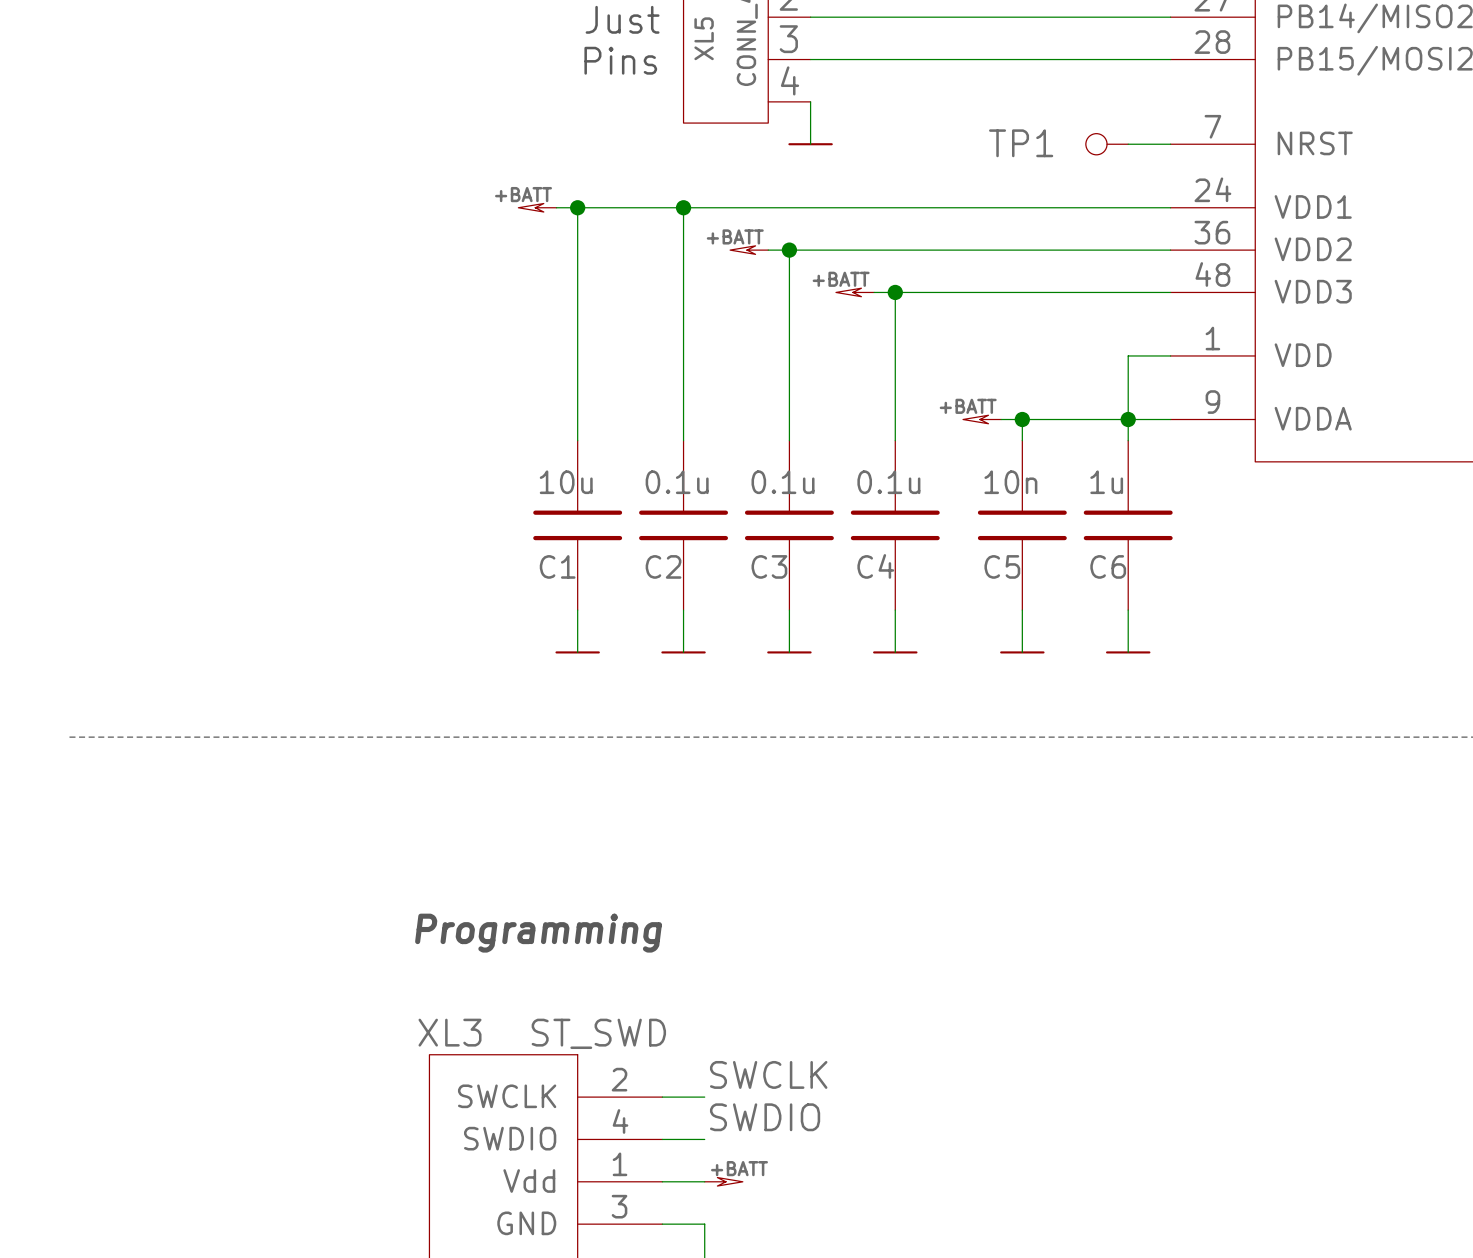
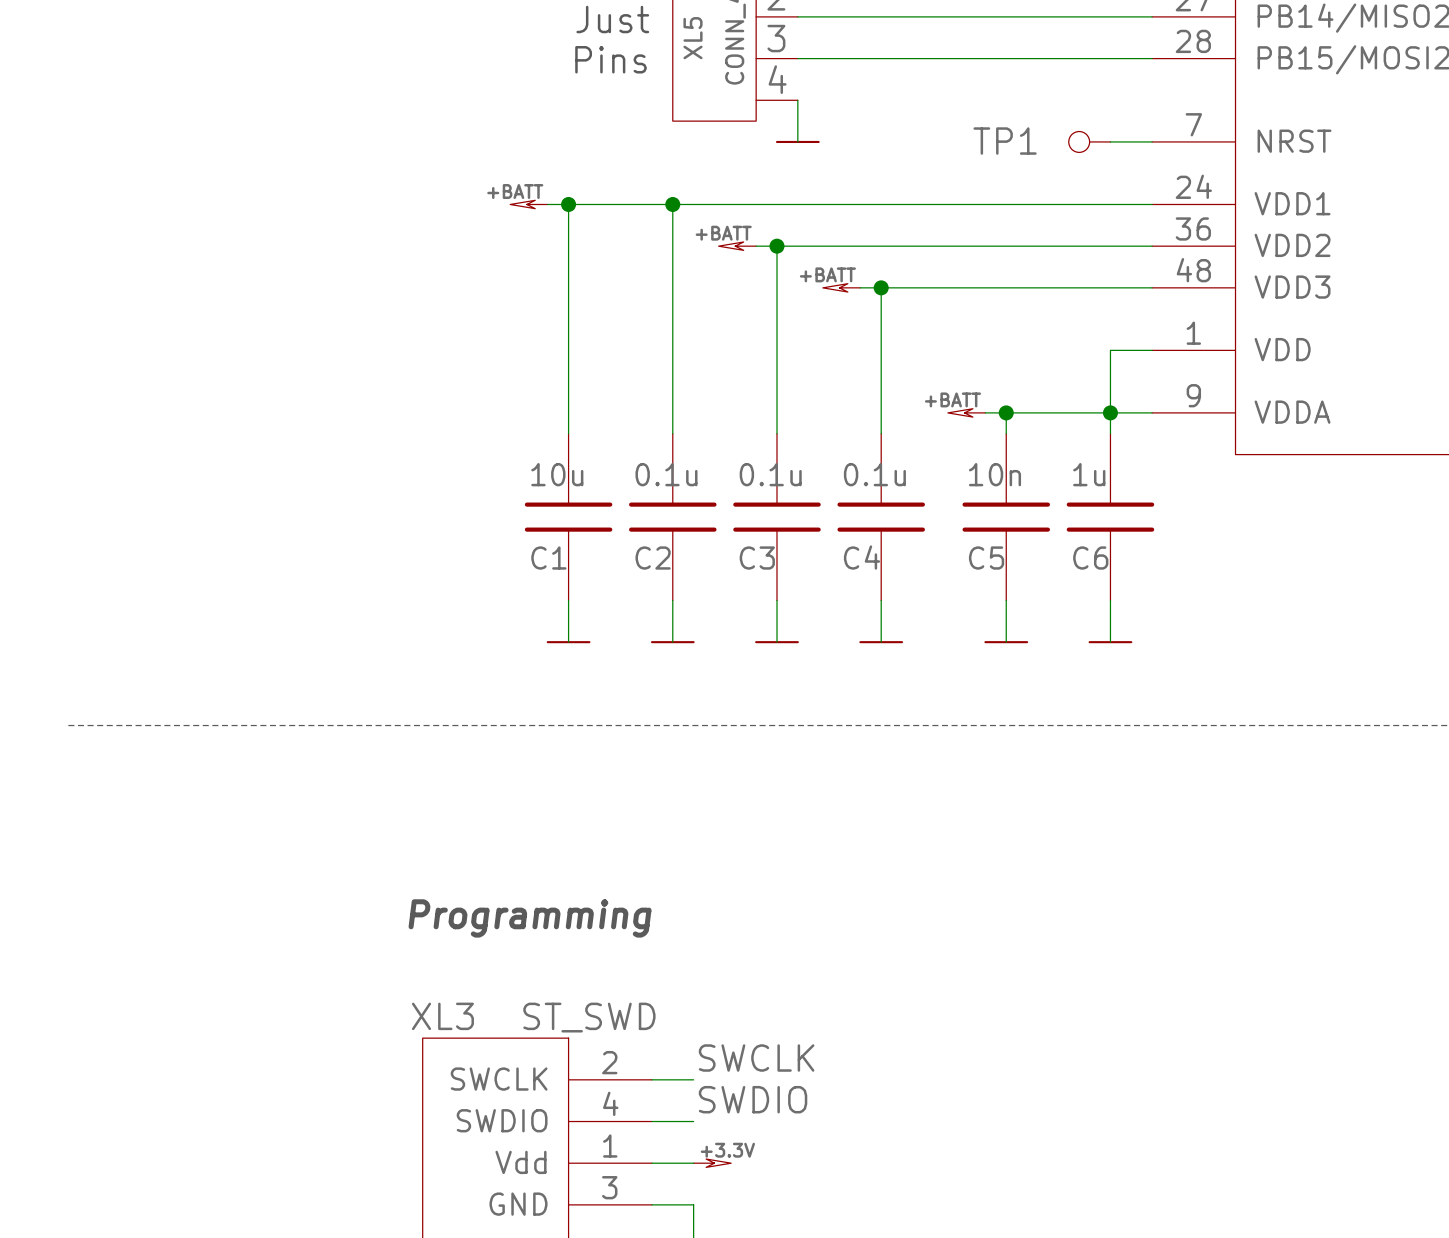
power symbol: +BATT (723, 1181) -> +3.3V (712, 1163)

